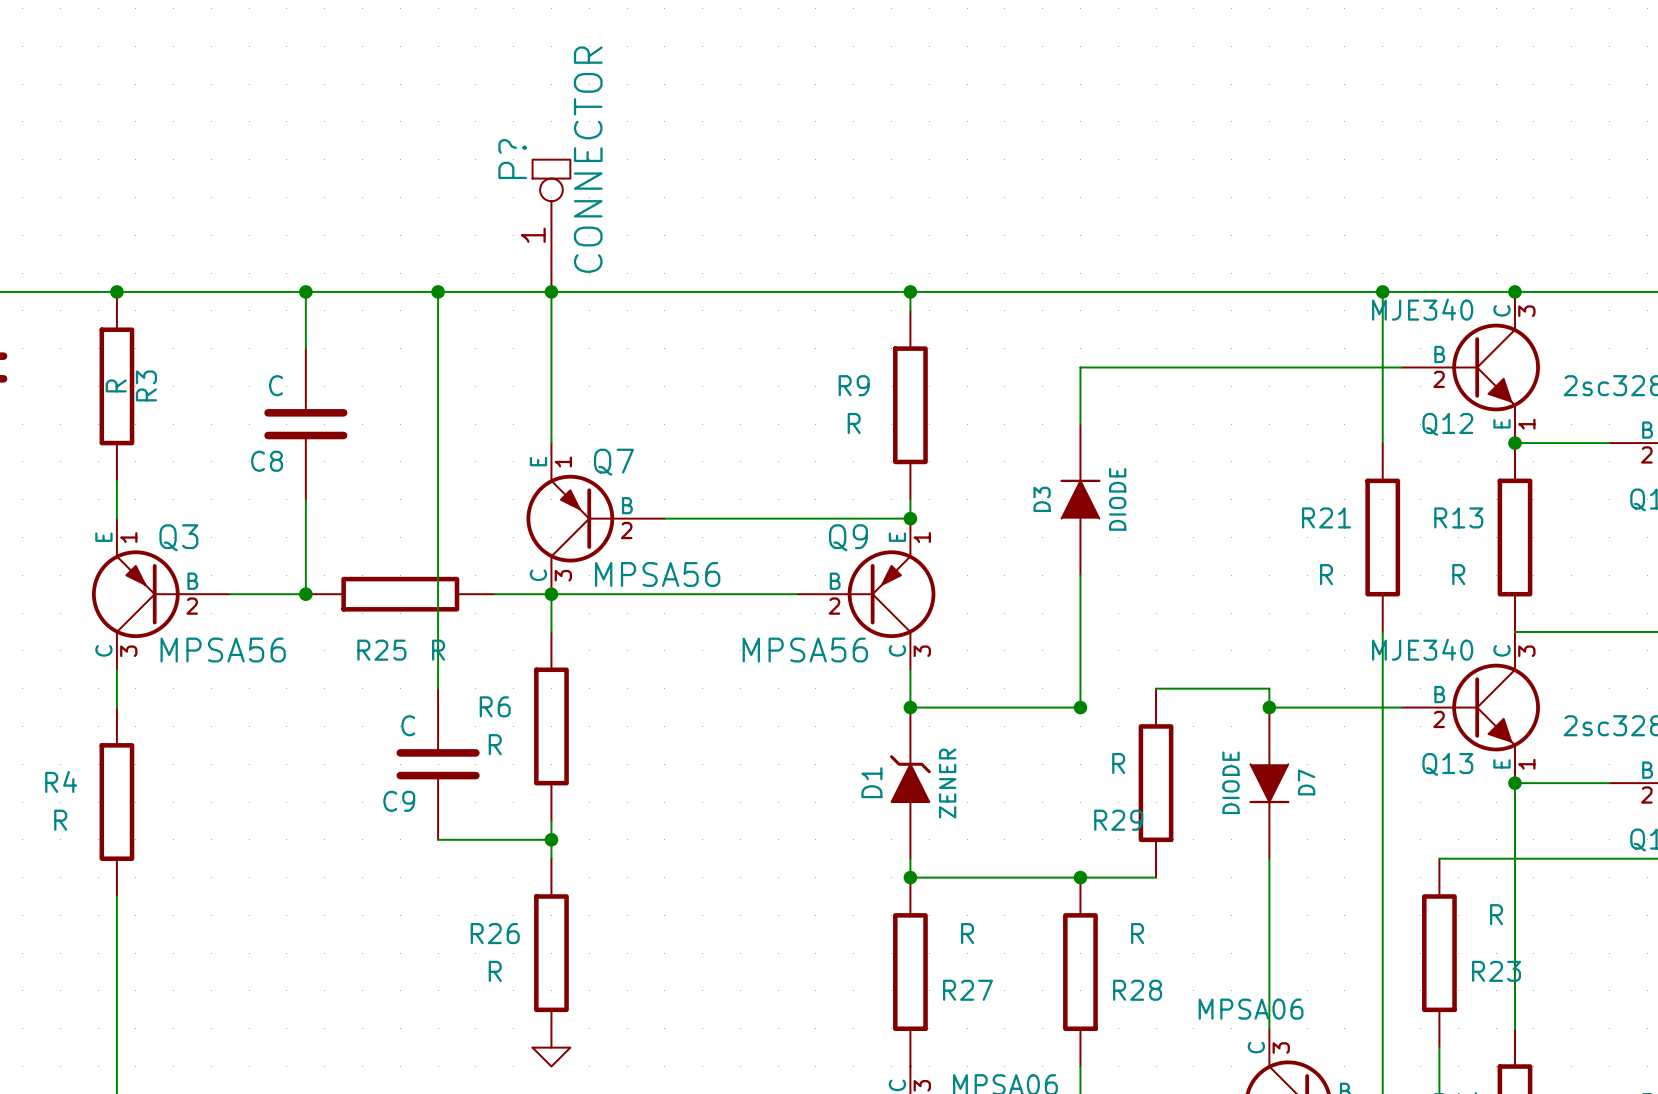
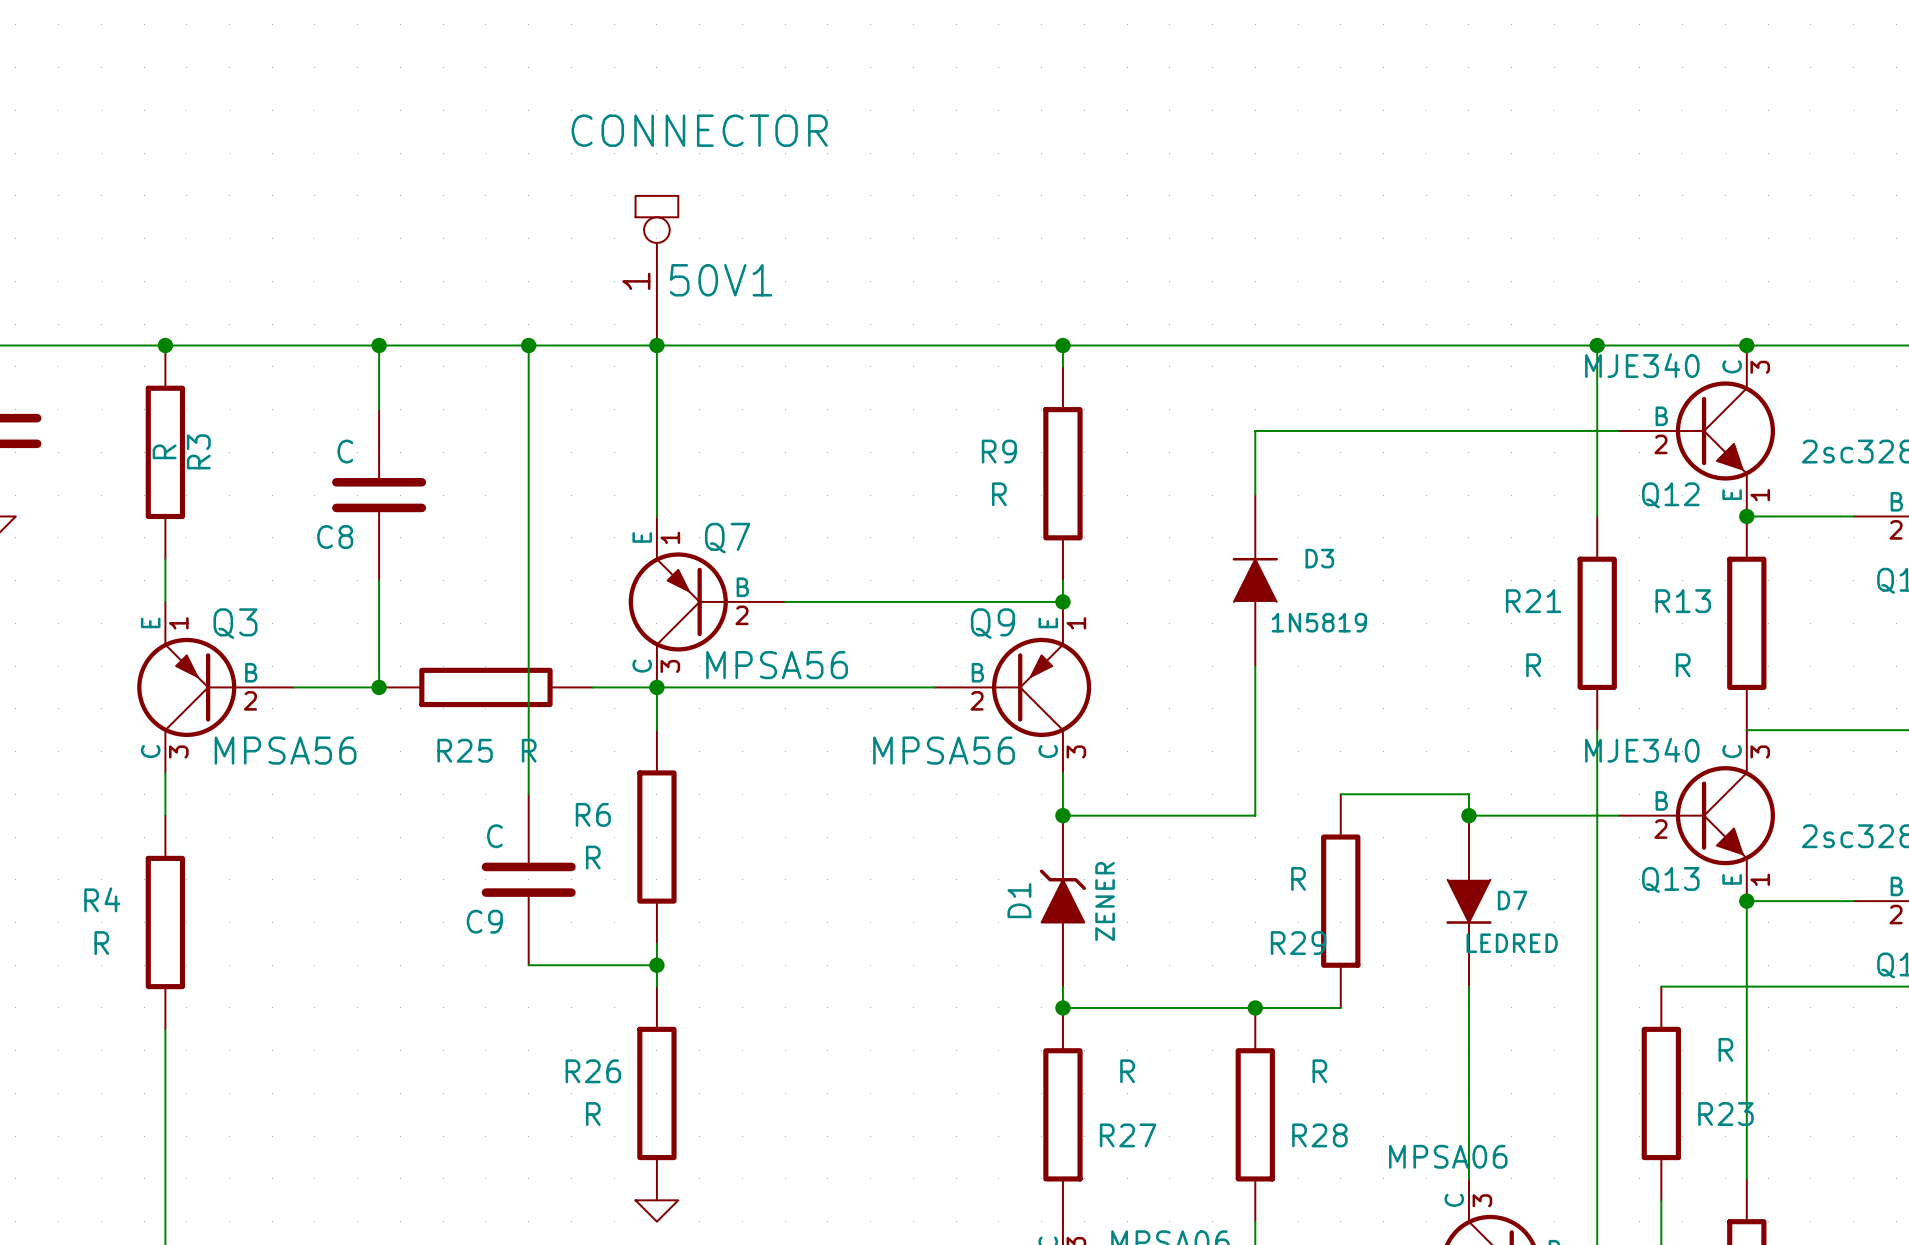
P? name: P? (512, 159) -> 50V1 (721, 280)
P? value rotation: 0° (588, 159) -> 90° clockwise (699, 130)
D3 name rotation: 0° (1042, 499) -> 90° clockwise (1319, 558)
D3 name position: D3 (1042, 499) -> D3 (1319, 558)
D3 value: DIODE (1117, 499) -> 1N5819 (1319, 622)
junction: (1080, 707) -> none
D7 value: DIODE (1231, 782) -> LEDRED (1512, 943)
D7 name rotation: 0° (1306, 782) -> 90° clockwise (1512, 900)

